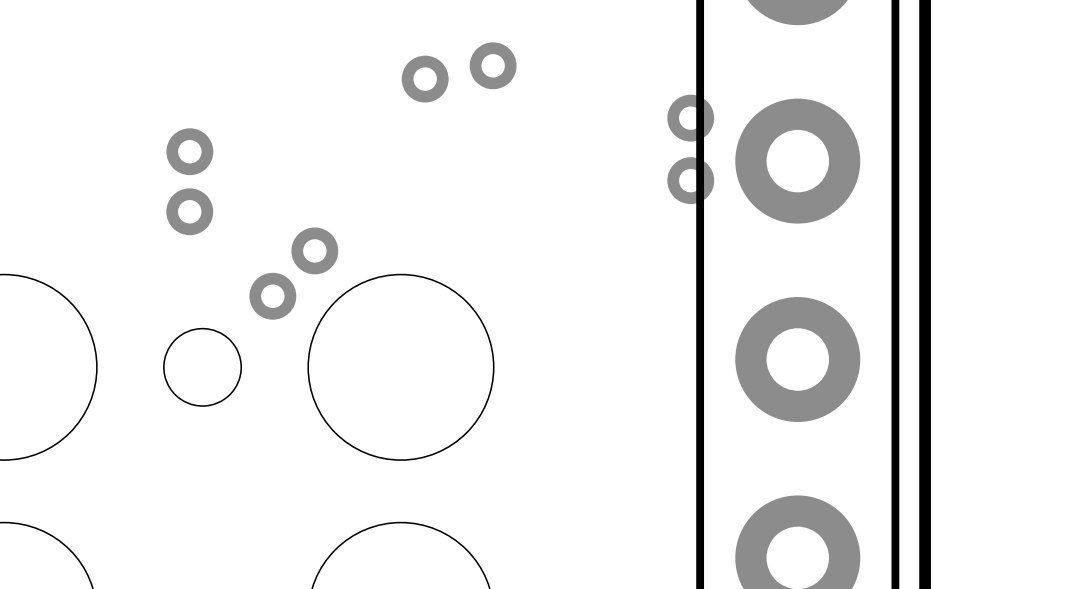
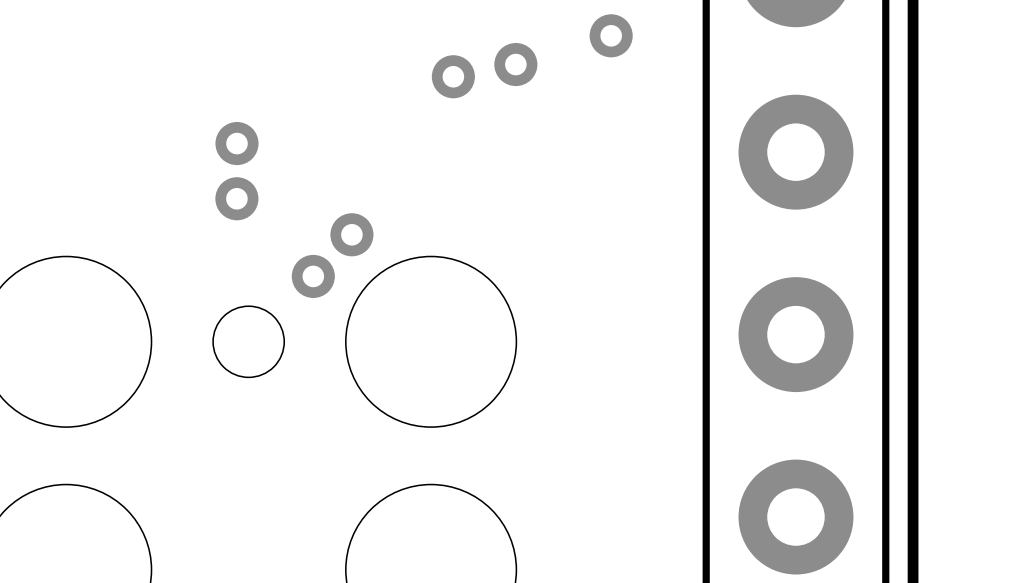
via: none -> (611, 35)
via: (690, 118) -> none
via: (690, 180) -> none

